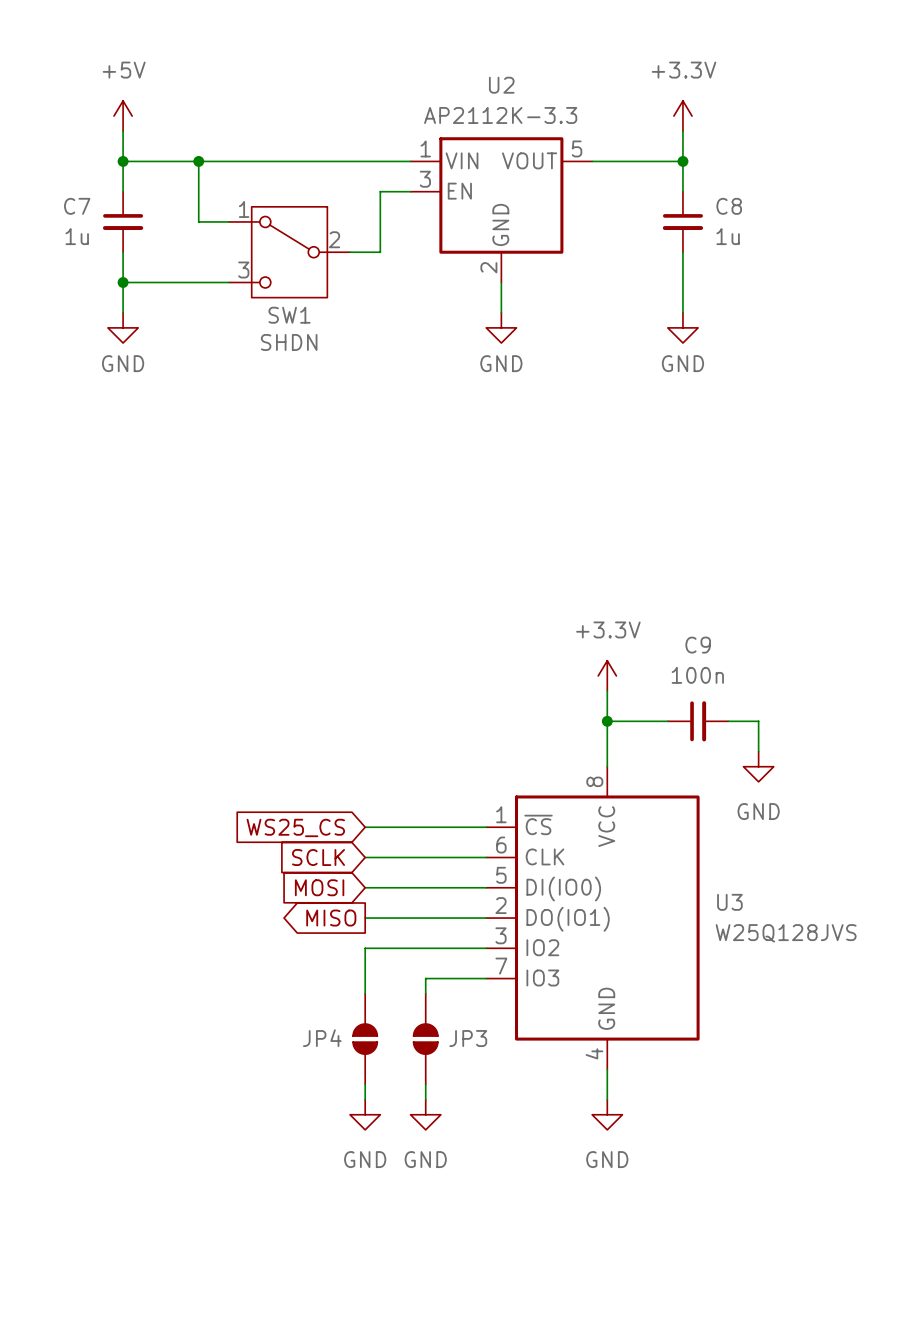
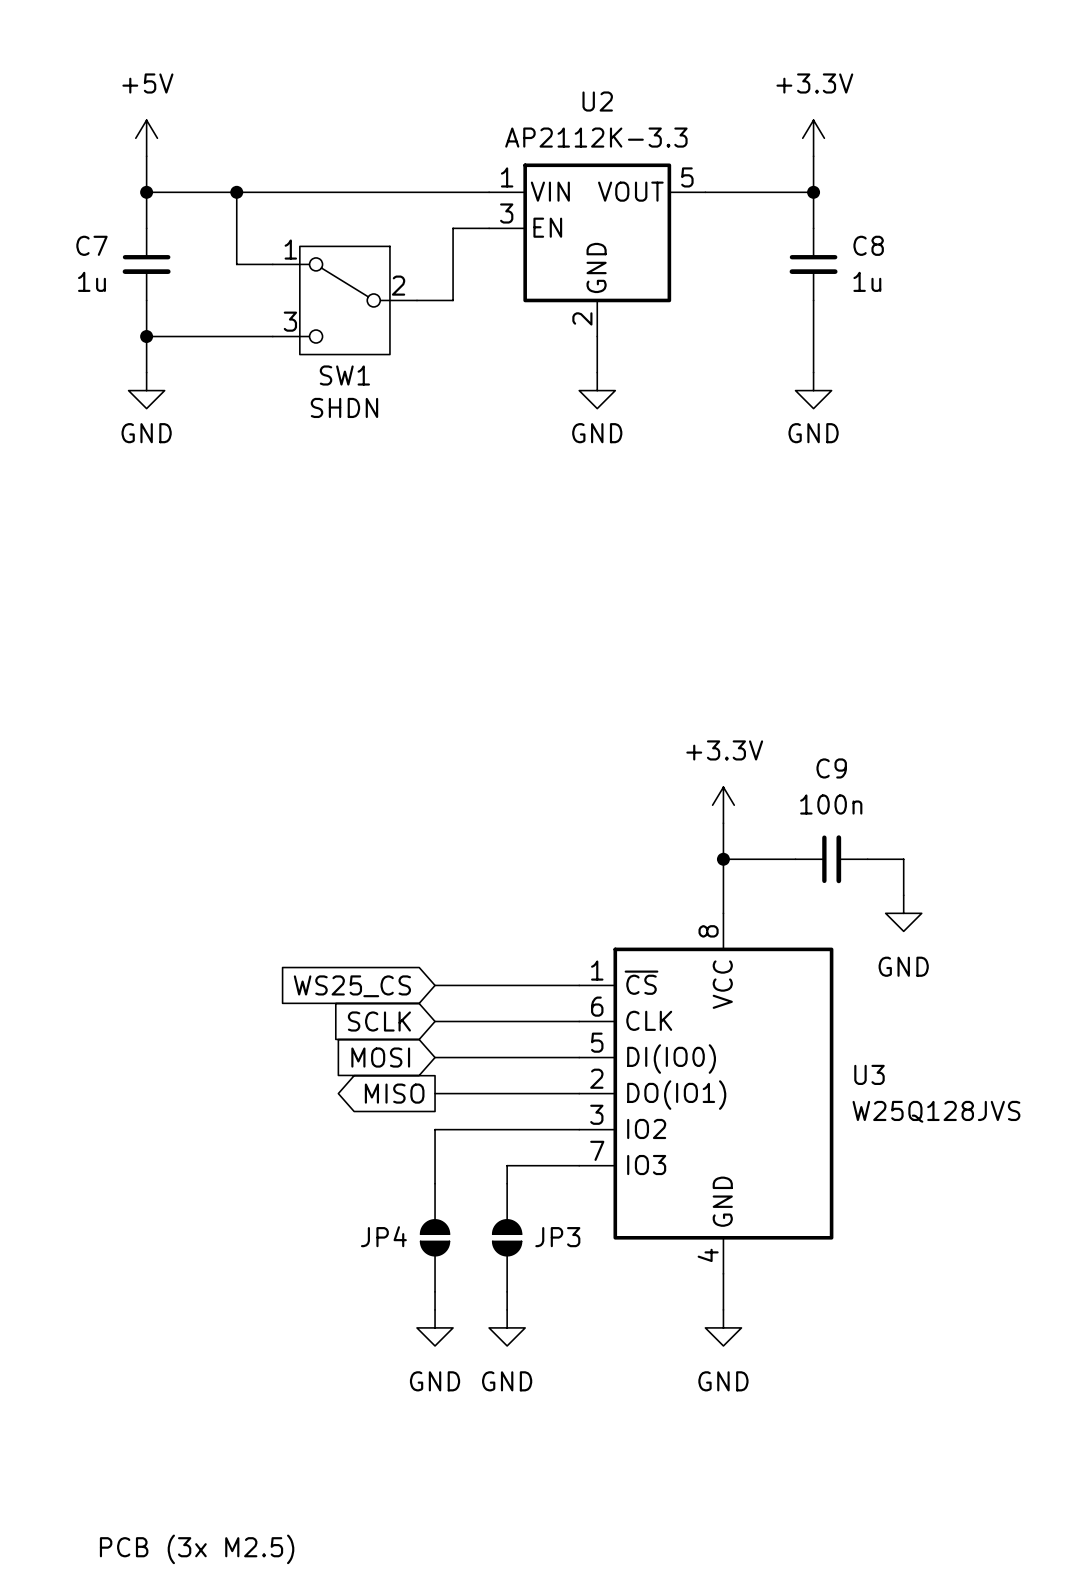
text: none -> PCB (3x M2.5) (197, 1549)

